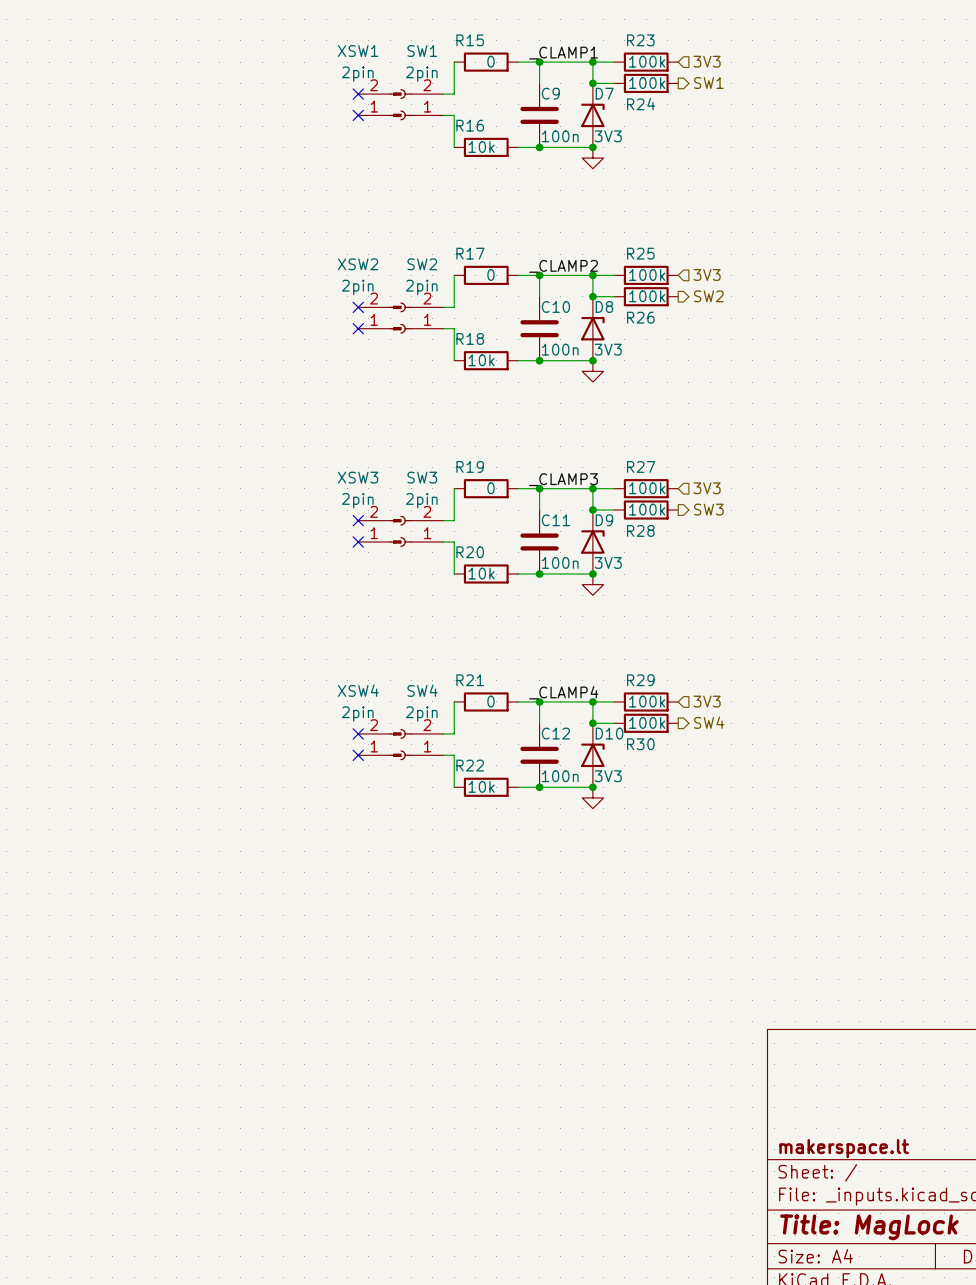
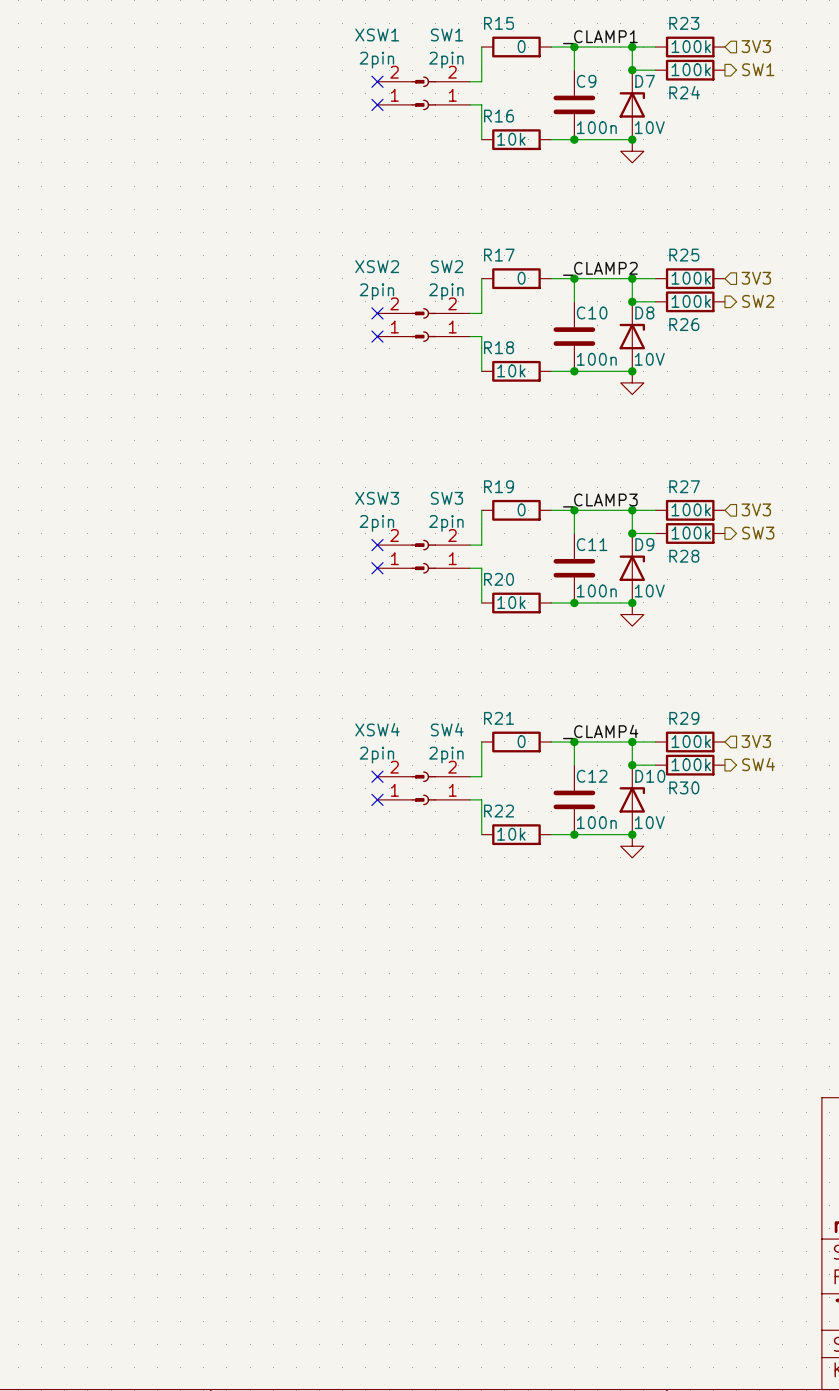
D7 value: 3V3 (608, 136) -> 10V (649, 127)
D8 value: 3V3 (608, 349) -> 10V (649, 359)
D9 value: 3V3 (608, 562) -> 10V (649, 590)
D10 value: 3V3 (608, 776) -> 10V (649, 822)

